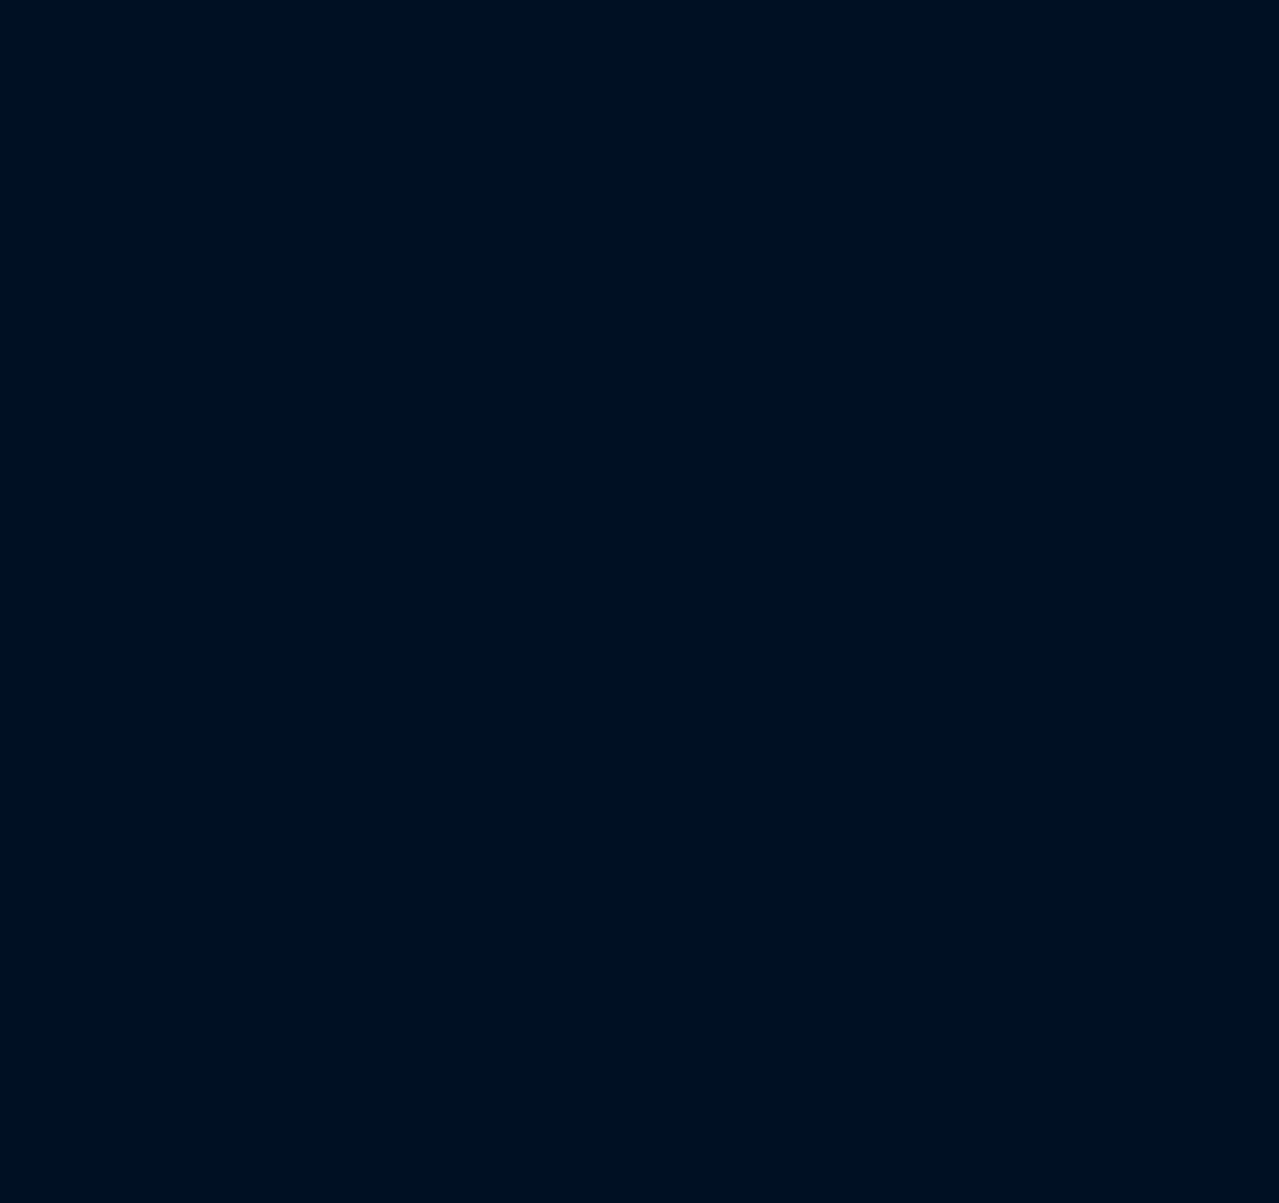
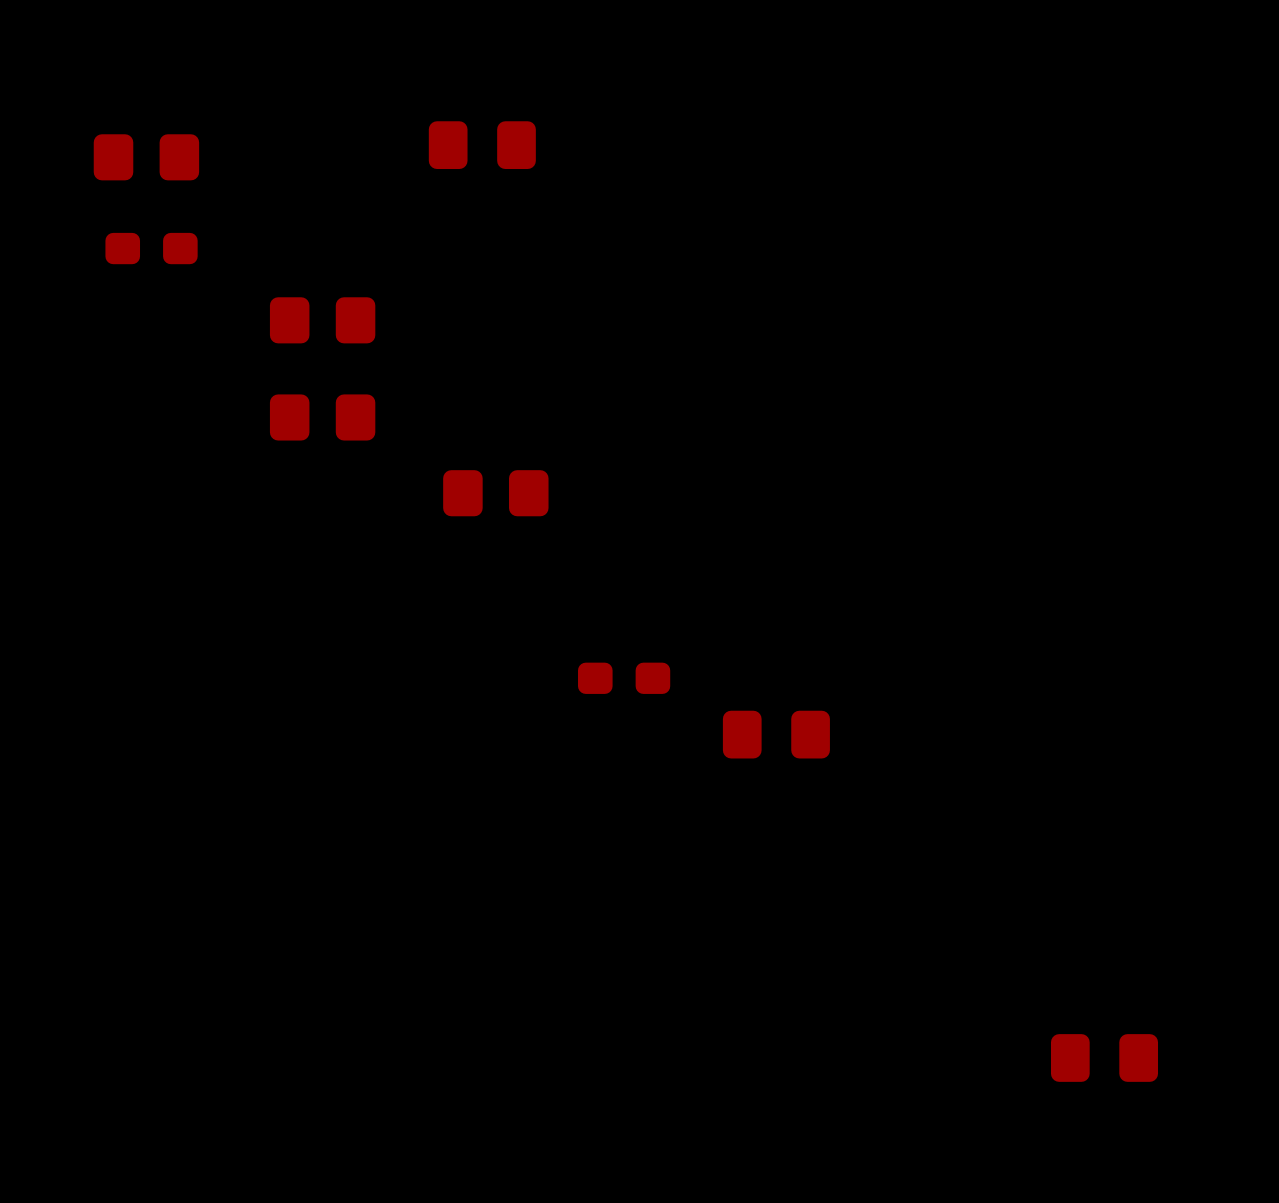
part: none -> (482, 145)
part: none -> (146, 157)
part: none -> (151, 248)
part: none -> (322, 320)
part: none -> (322, 417)
part: none -> (495, 493)
part: none -> (624, 678)
part: none -> (776, 734)
part: none -> (1104, 1057)

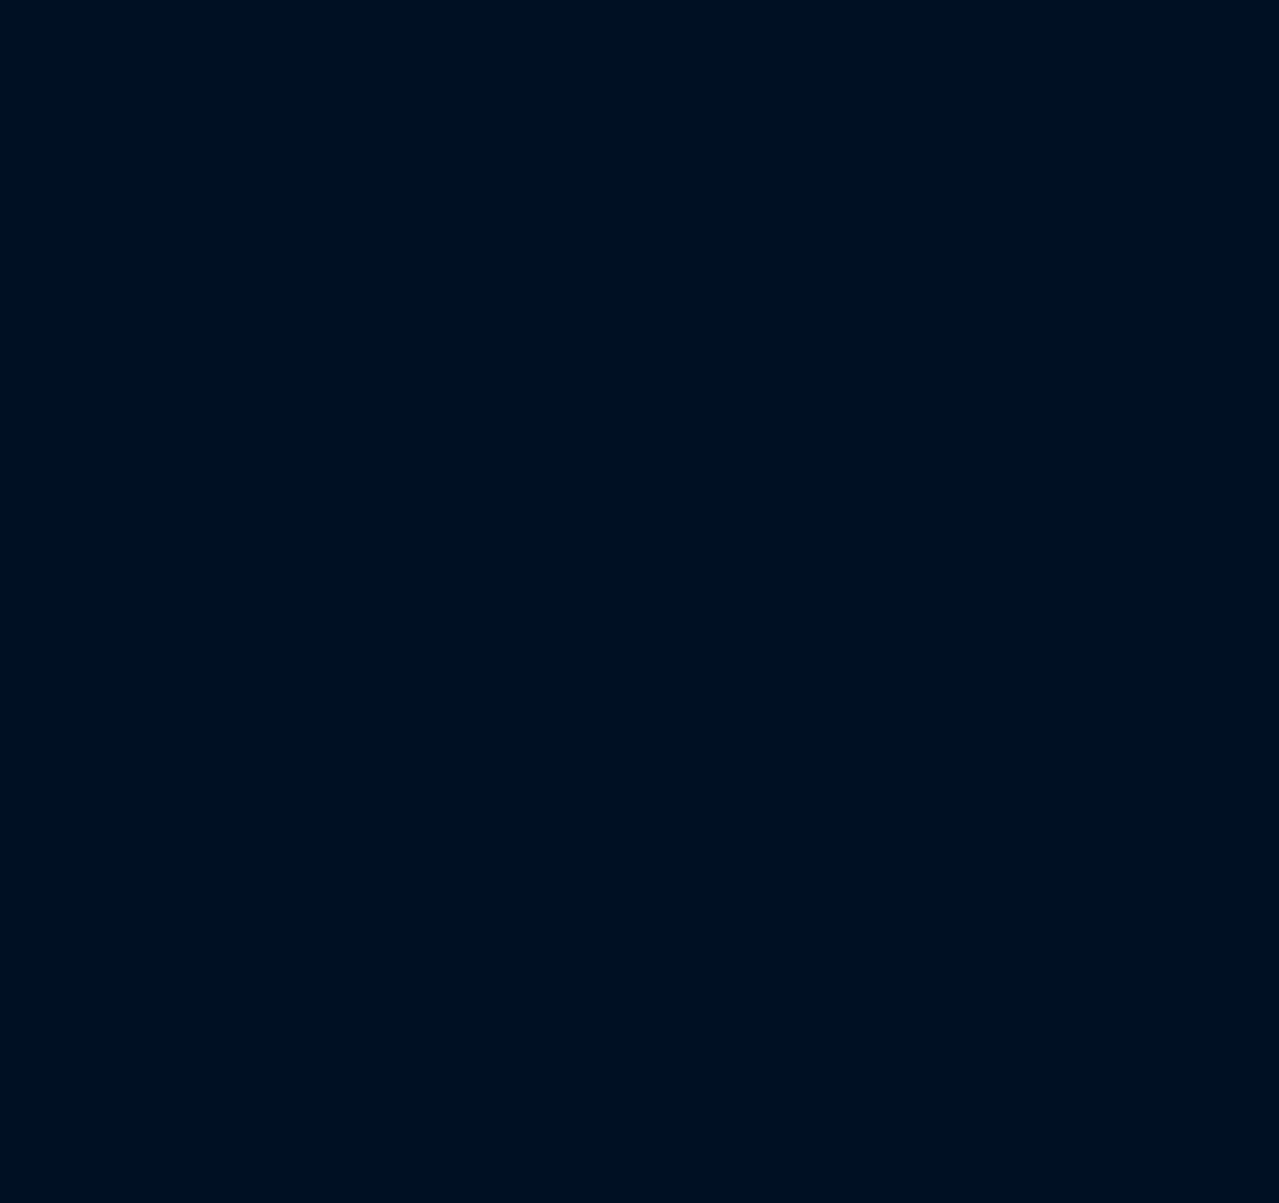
part: (482, 145) -> none
part: (146, 157) -> none
part: (151, 248) -> none
part: (322, 320) -> none
part: (322, 417) -> none
part: (495, 493) -> none
part: (624, 678) -> none
part: (776, 734) -> none
part: (1104, 1057) -> none

